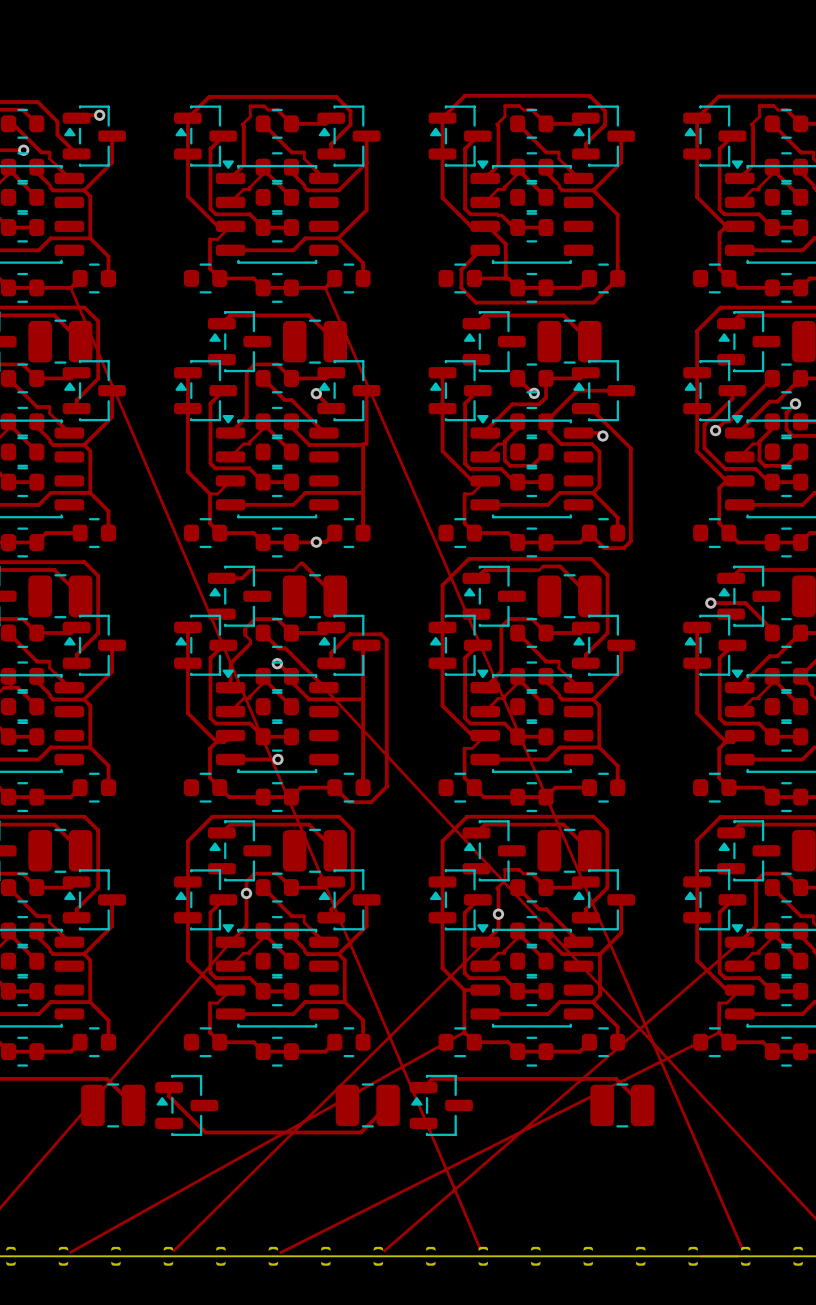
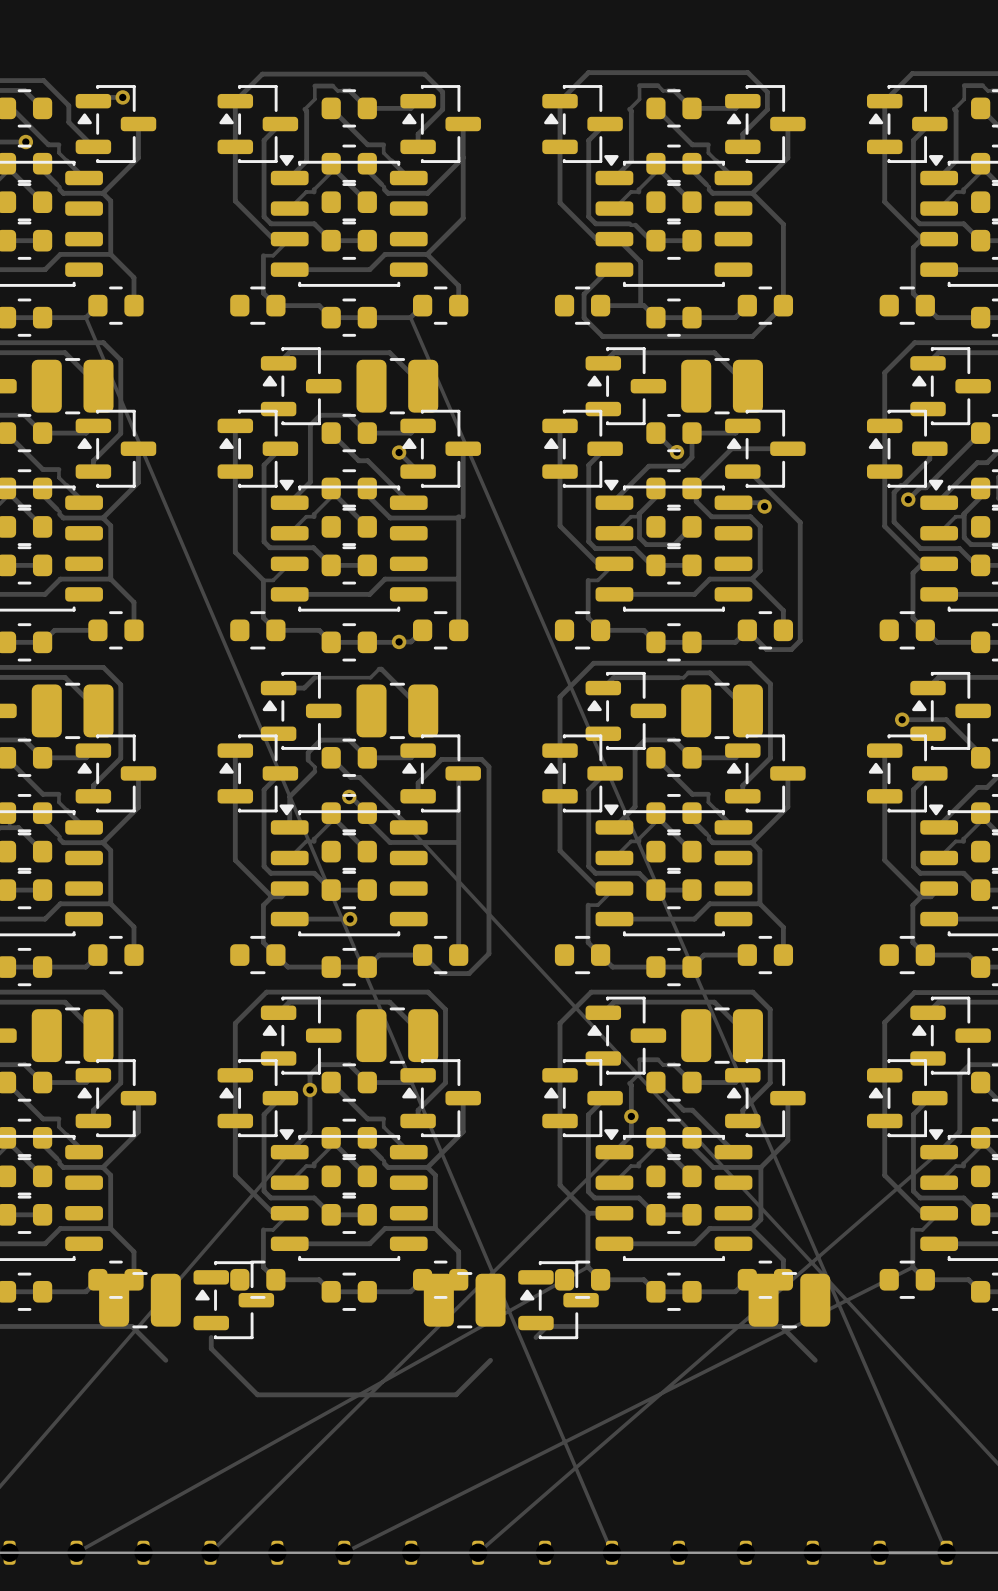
part position: (113, 1105) -> (139, 1300)
part position: (186, 1105) -> (233, 1300)
part position: (367, 1105) -> (464, 1300)
part position: (441, 1105) -> (558, 1300)
part position: (622, 1105) -> (789, 1300)

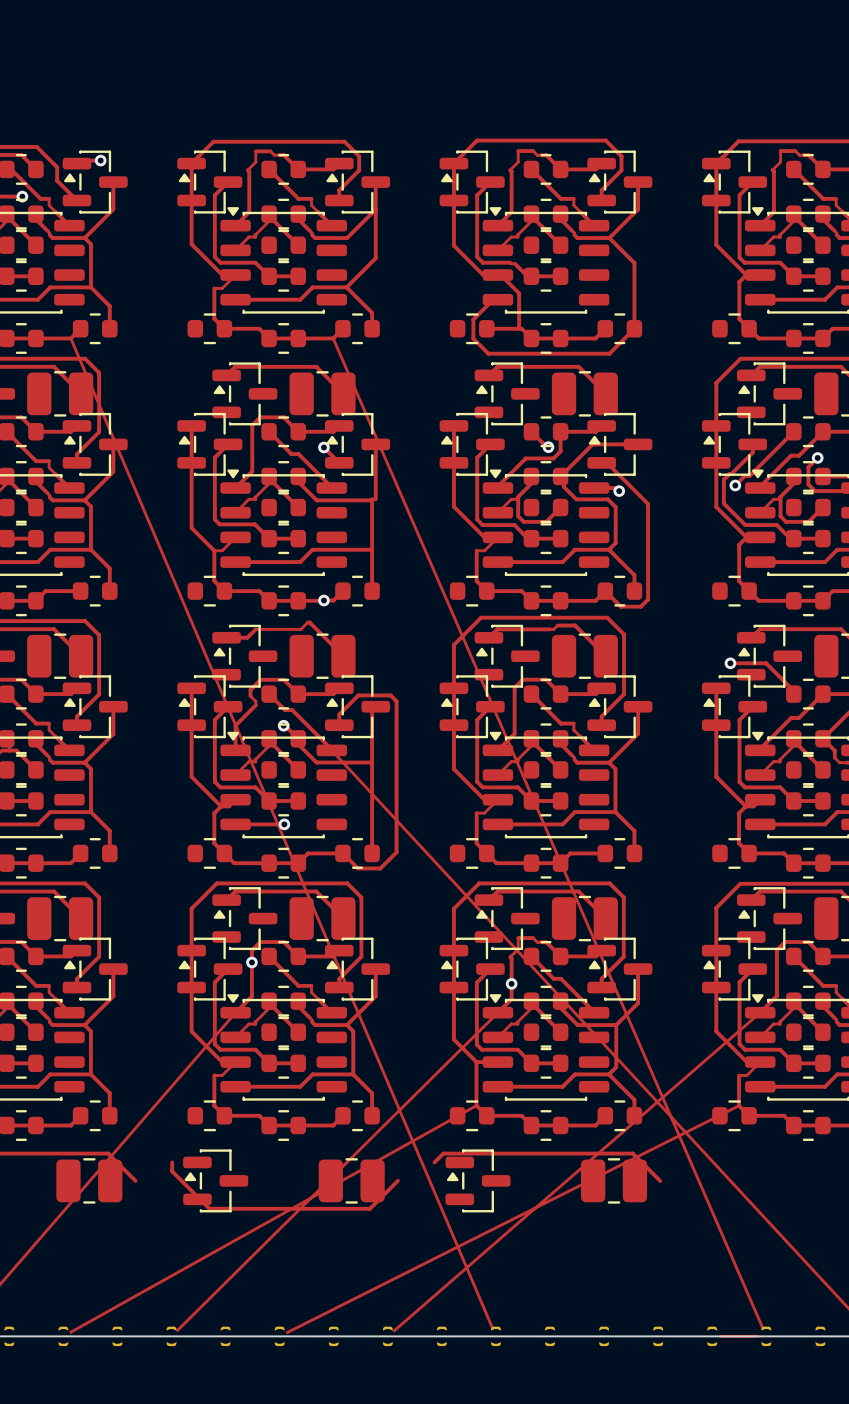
part position: (139, 1300) -> (89, 1180)
part position: (233, 1300) -> (215, 1180)
part position: (464, 1300) -> (351, 1180)
part position: (558, 1300) -> (478, 1180)
part position: (789, 1300) -> (614, 1180)

